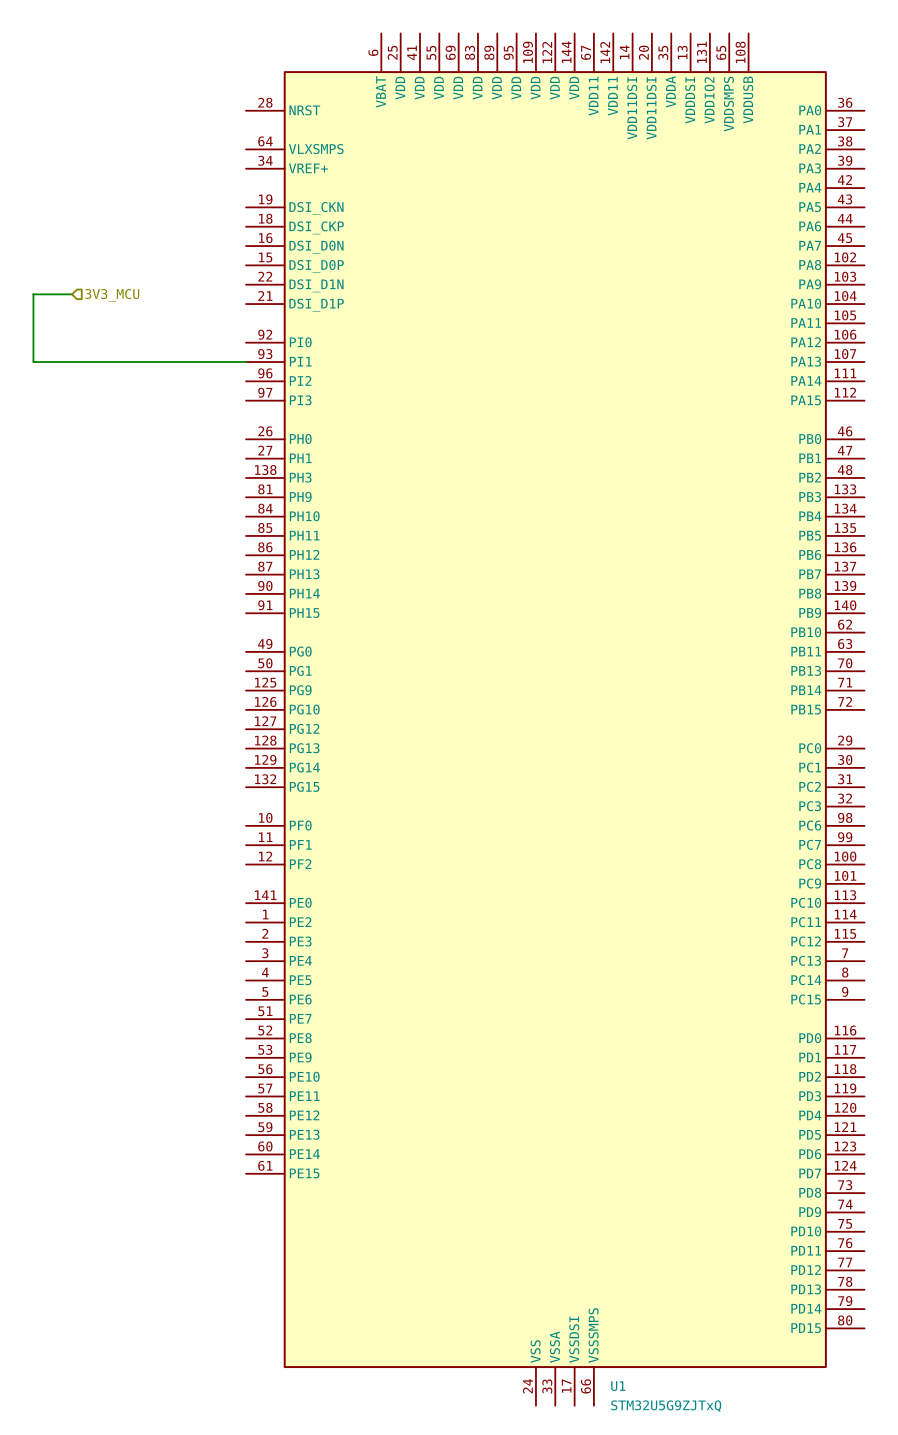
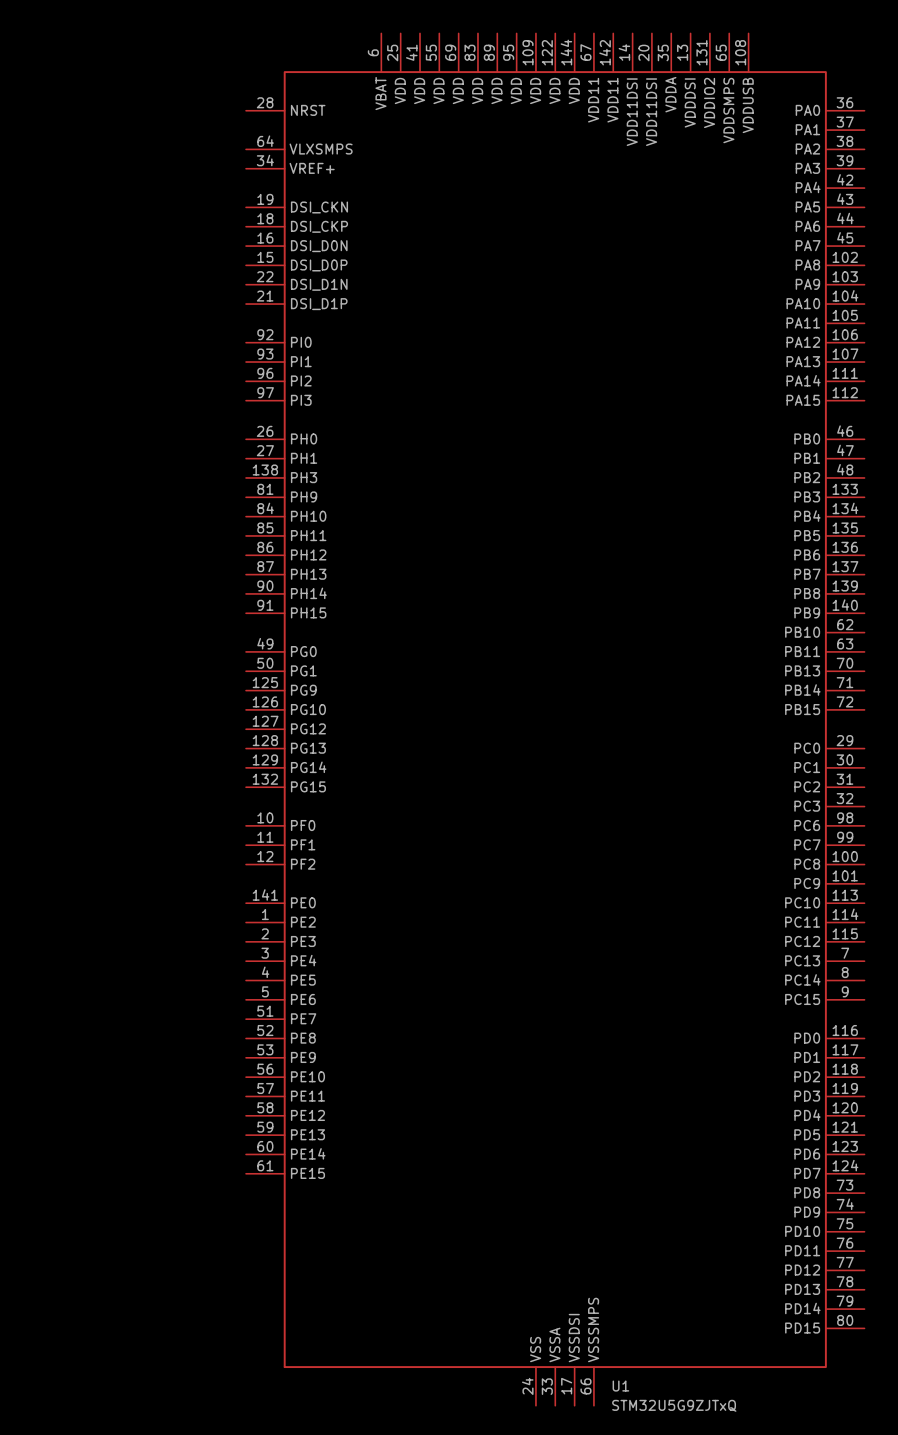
wire: (72, 294) (33, 294) (33, 362) (246, 362) -> none
hierarchical label: 3V3_MCU (112, 295) -> none

